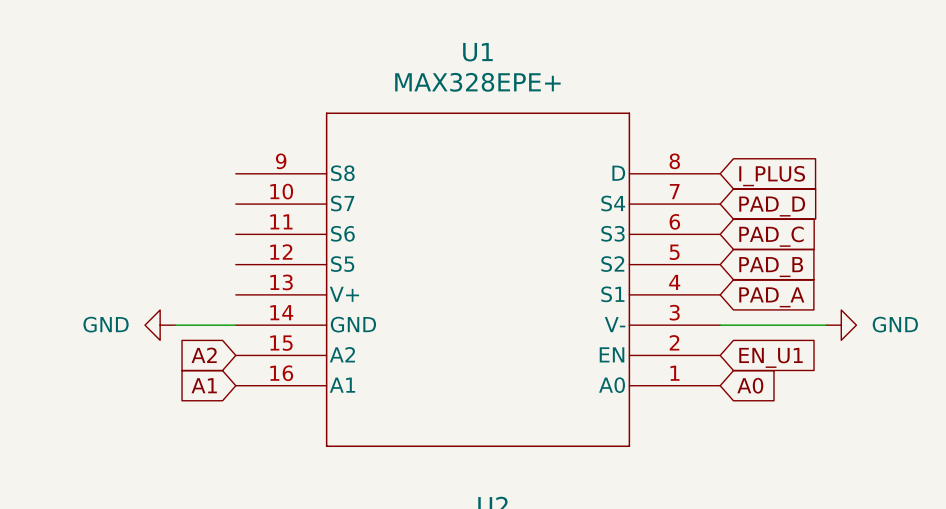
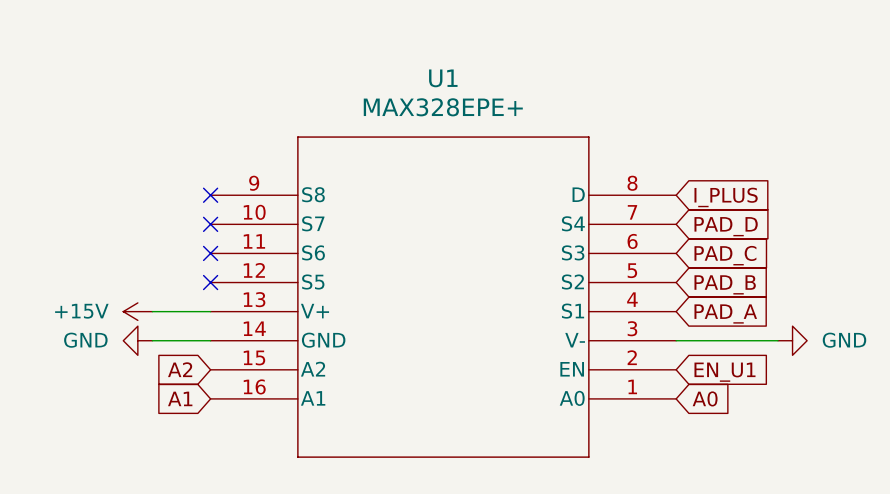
no-connect mark: none -> (210, 195)
no-connect mark: none -> (210, 224)
no-connect mark: none -> (210, 253)
no-connect mark: none -> (210, 282)
power symbol: none -> +15V (137, 311)
wire: none -> (152, 311) (210, 311)

